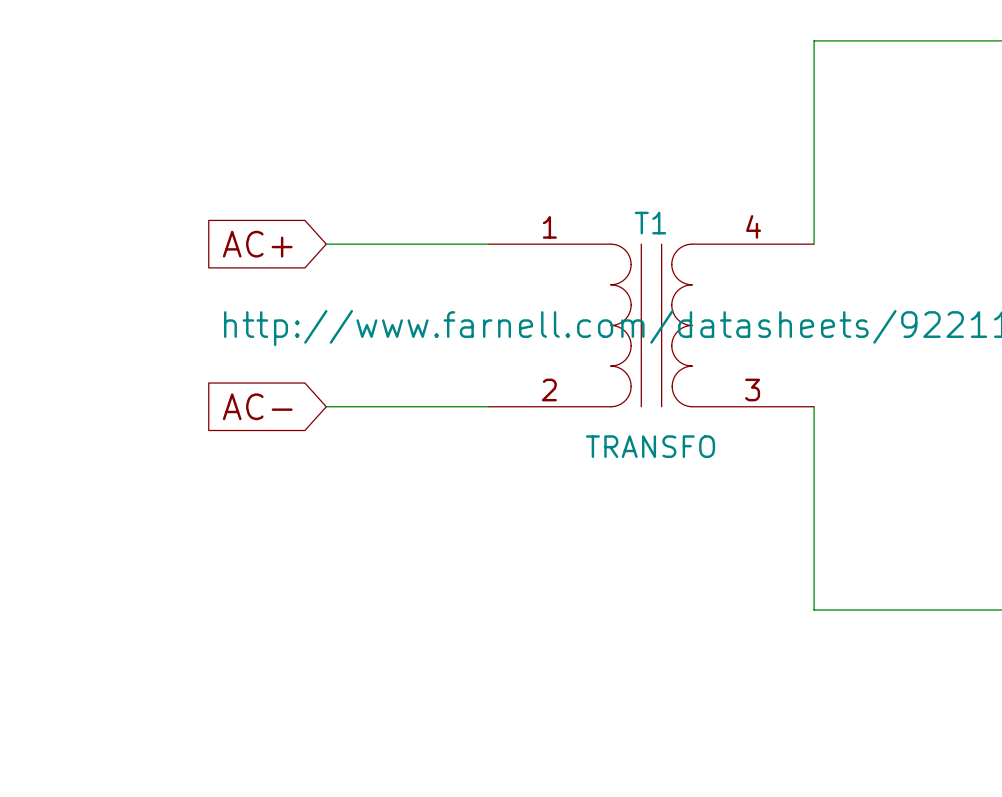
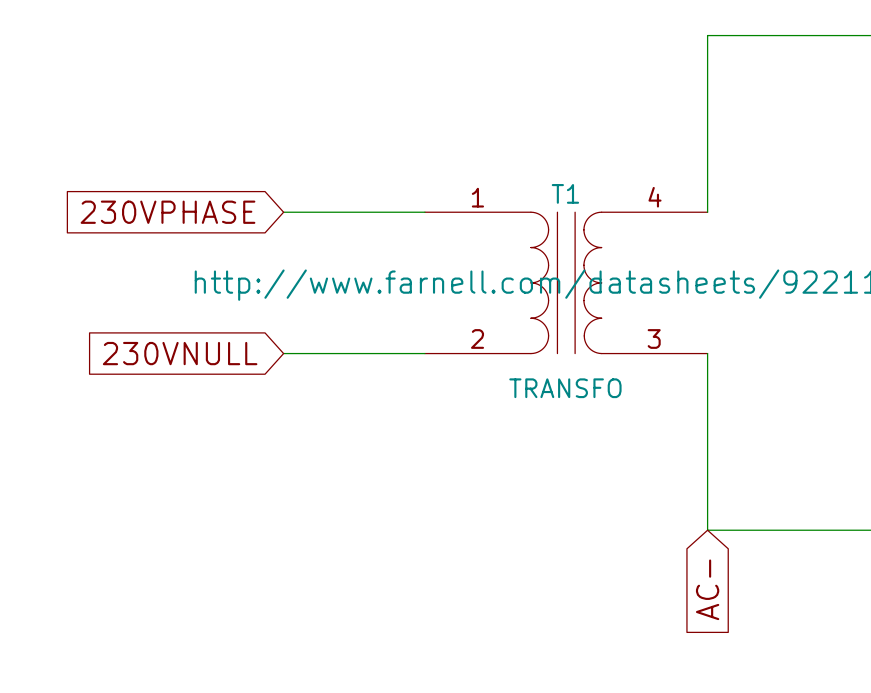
global label: AC+ (257, 244) -> 230VPHASE (168, 212)
global label: AC- (257, 406) -> 230VNULL (180, 353)
global label: none -> AC- (707, 589)

